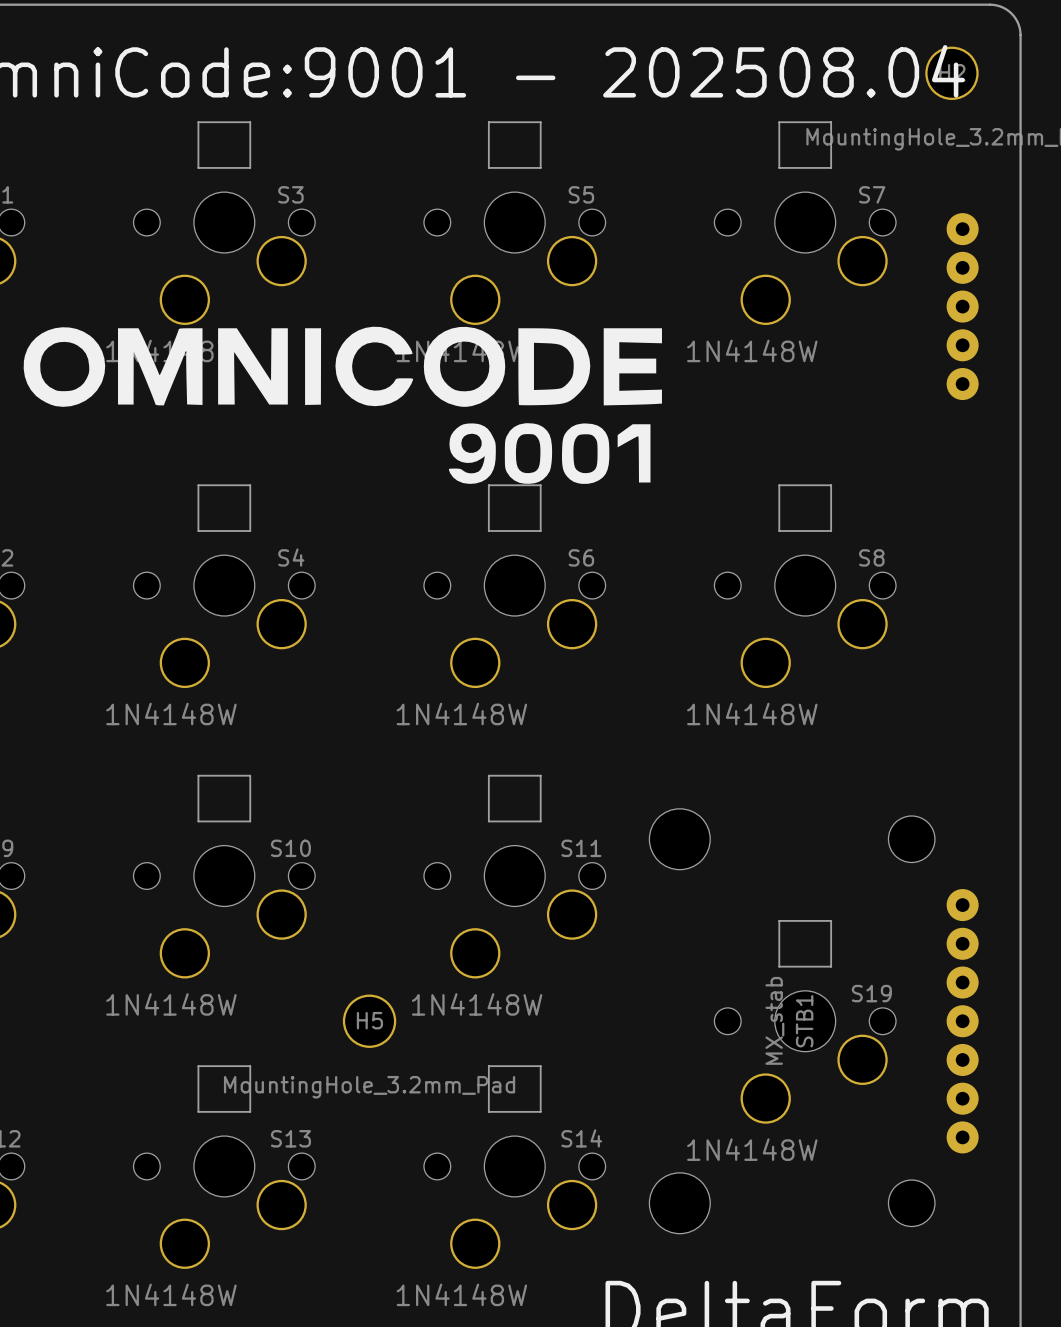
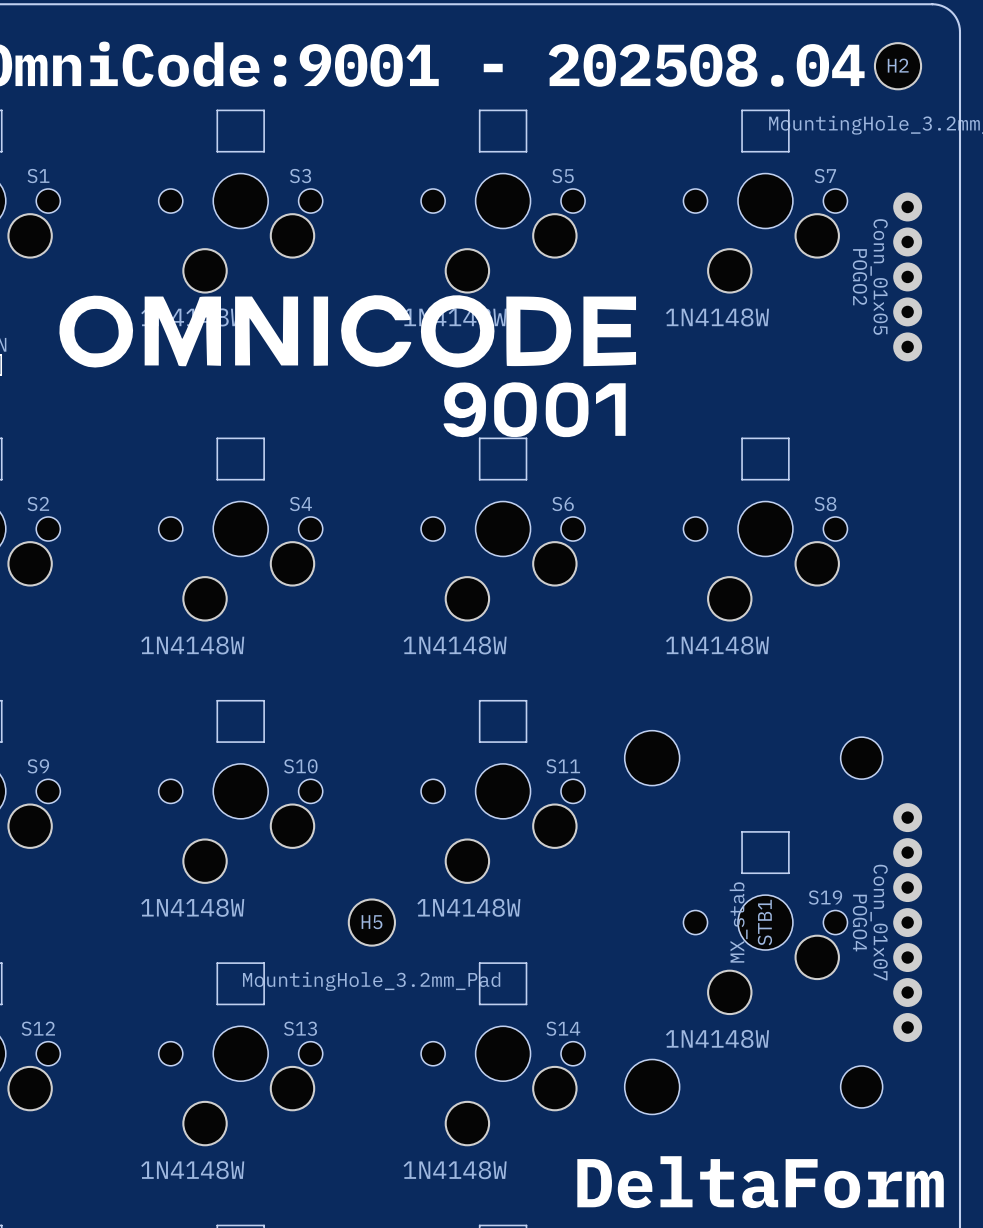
POGO2 name: none -> POGO2 (859, 277)
POGO2 value: none -> Conn_01x05 (879, 276)
POGO4 name: none -> POGO4 (859, 923)
POGO4 value: none -> Conn_01x07 (879, 922)

